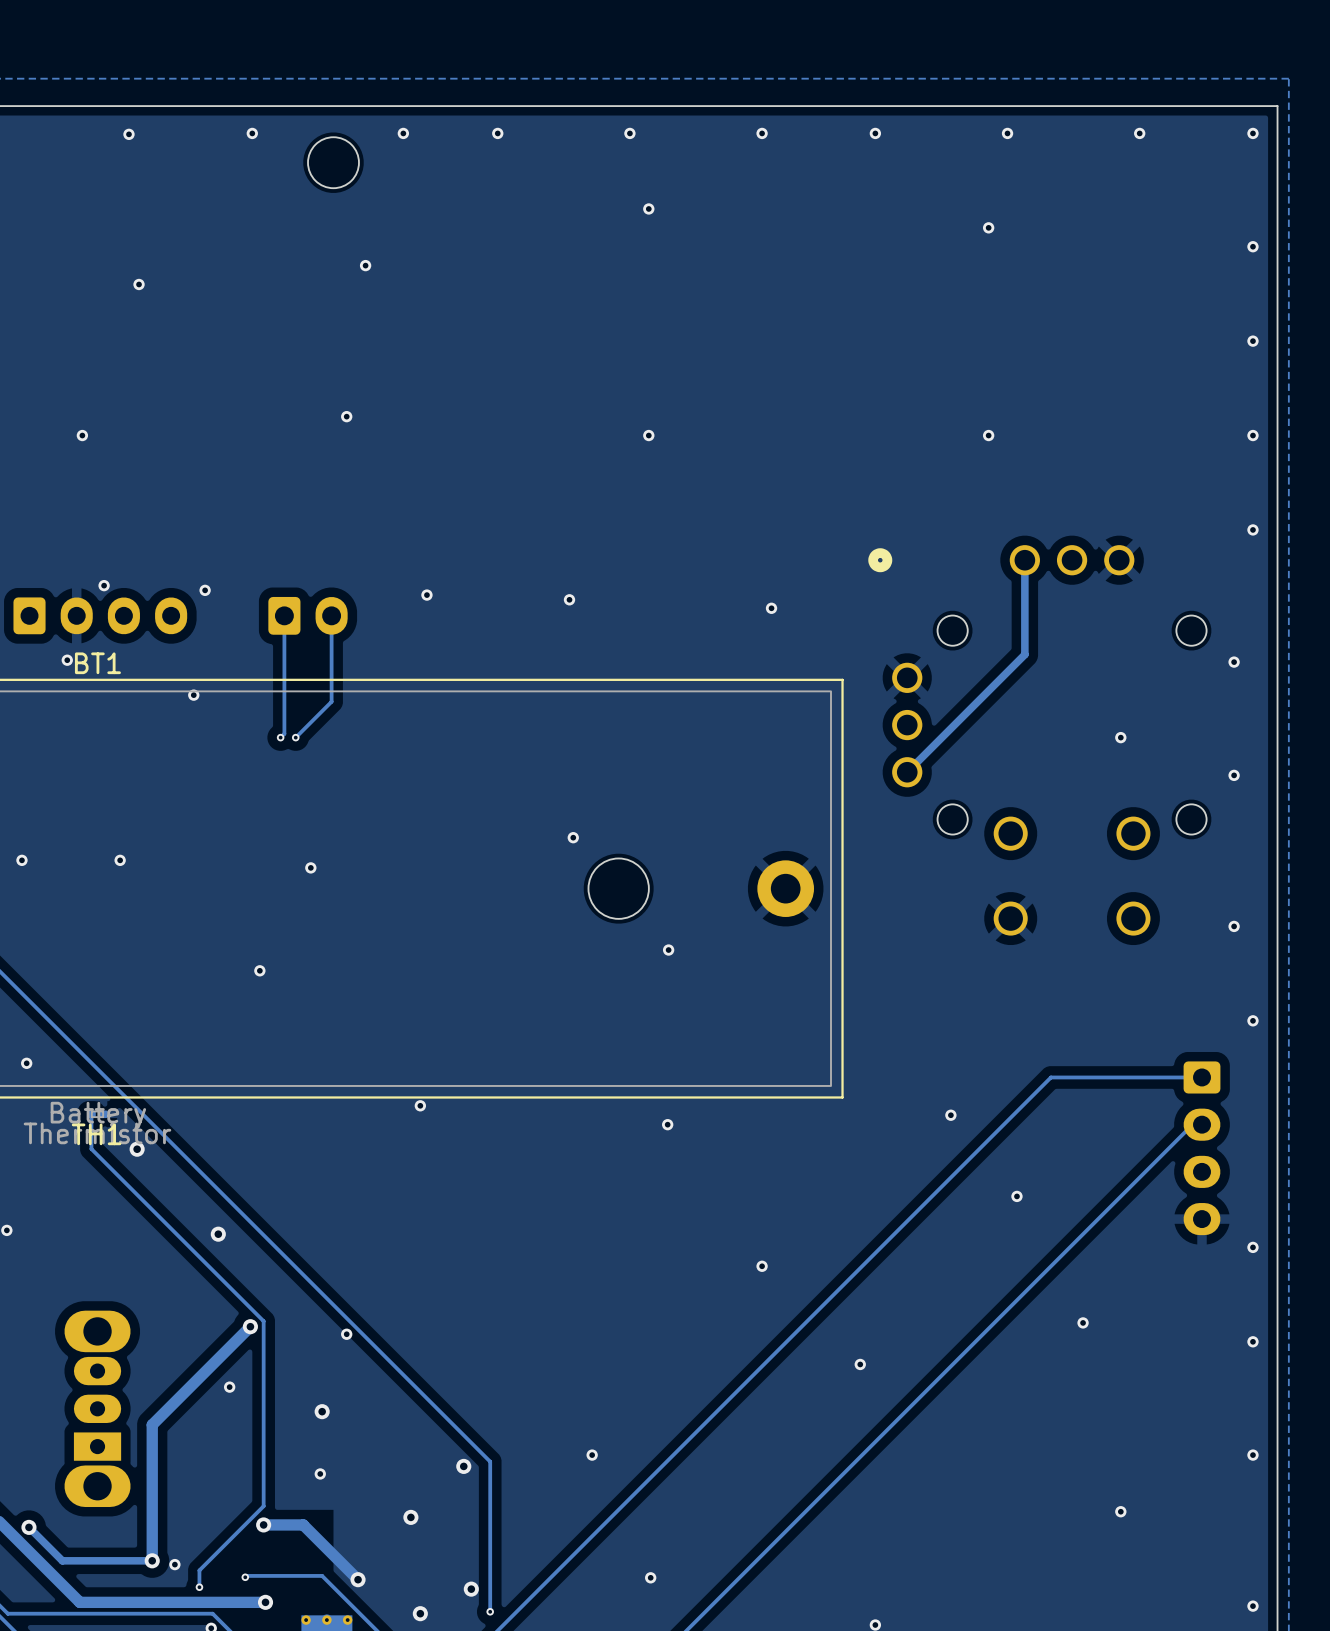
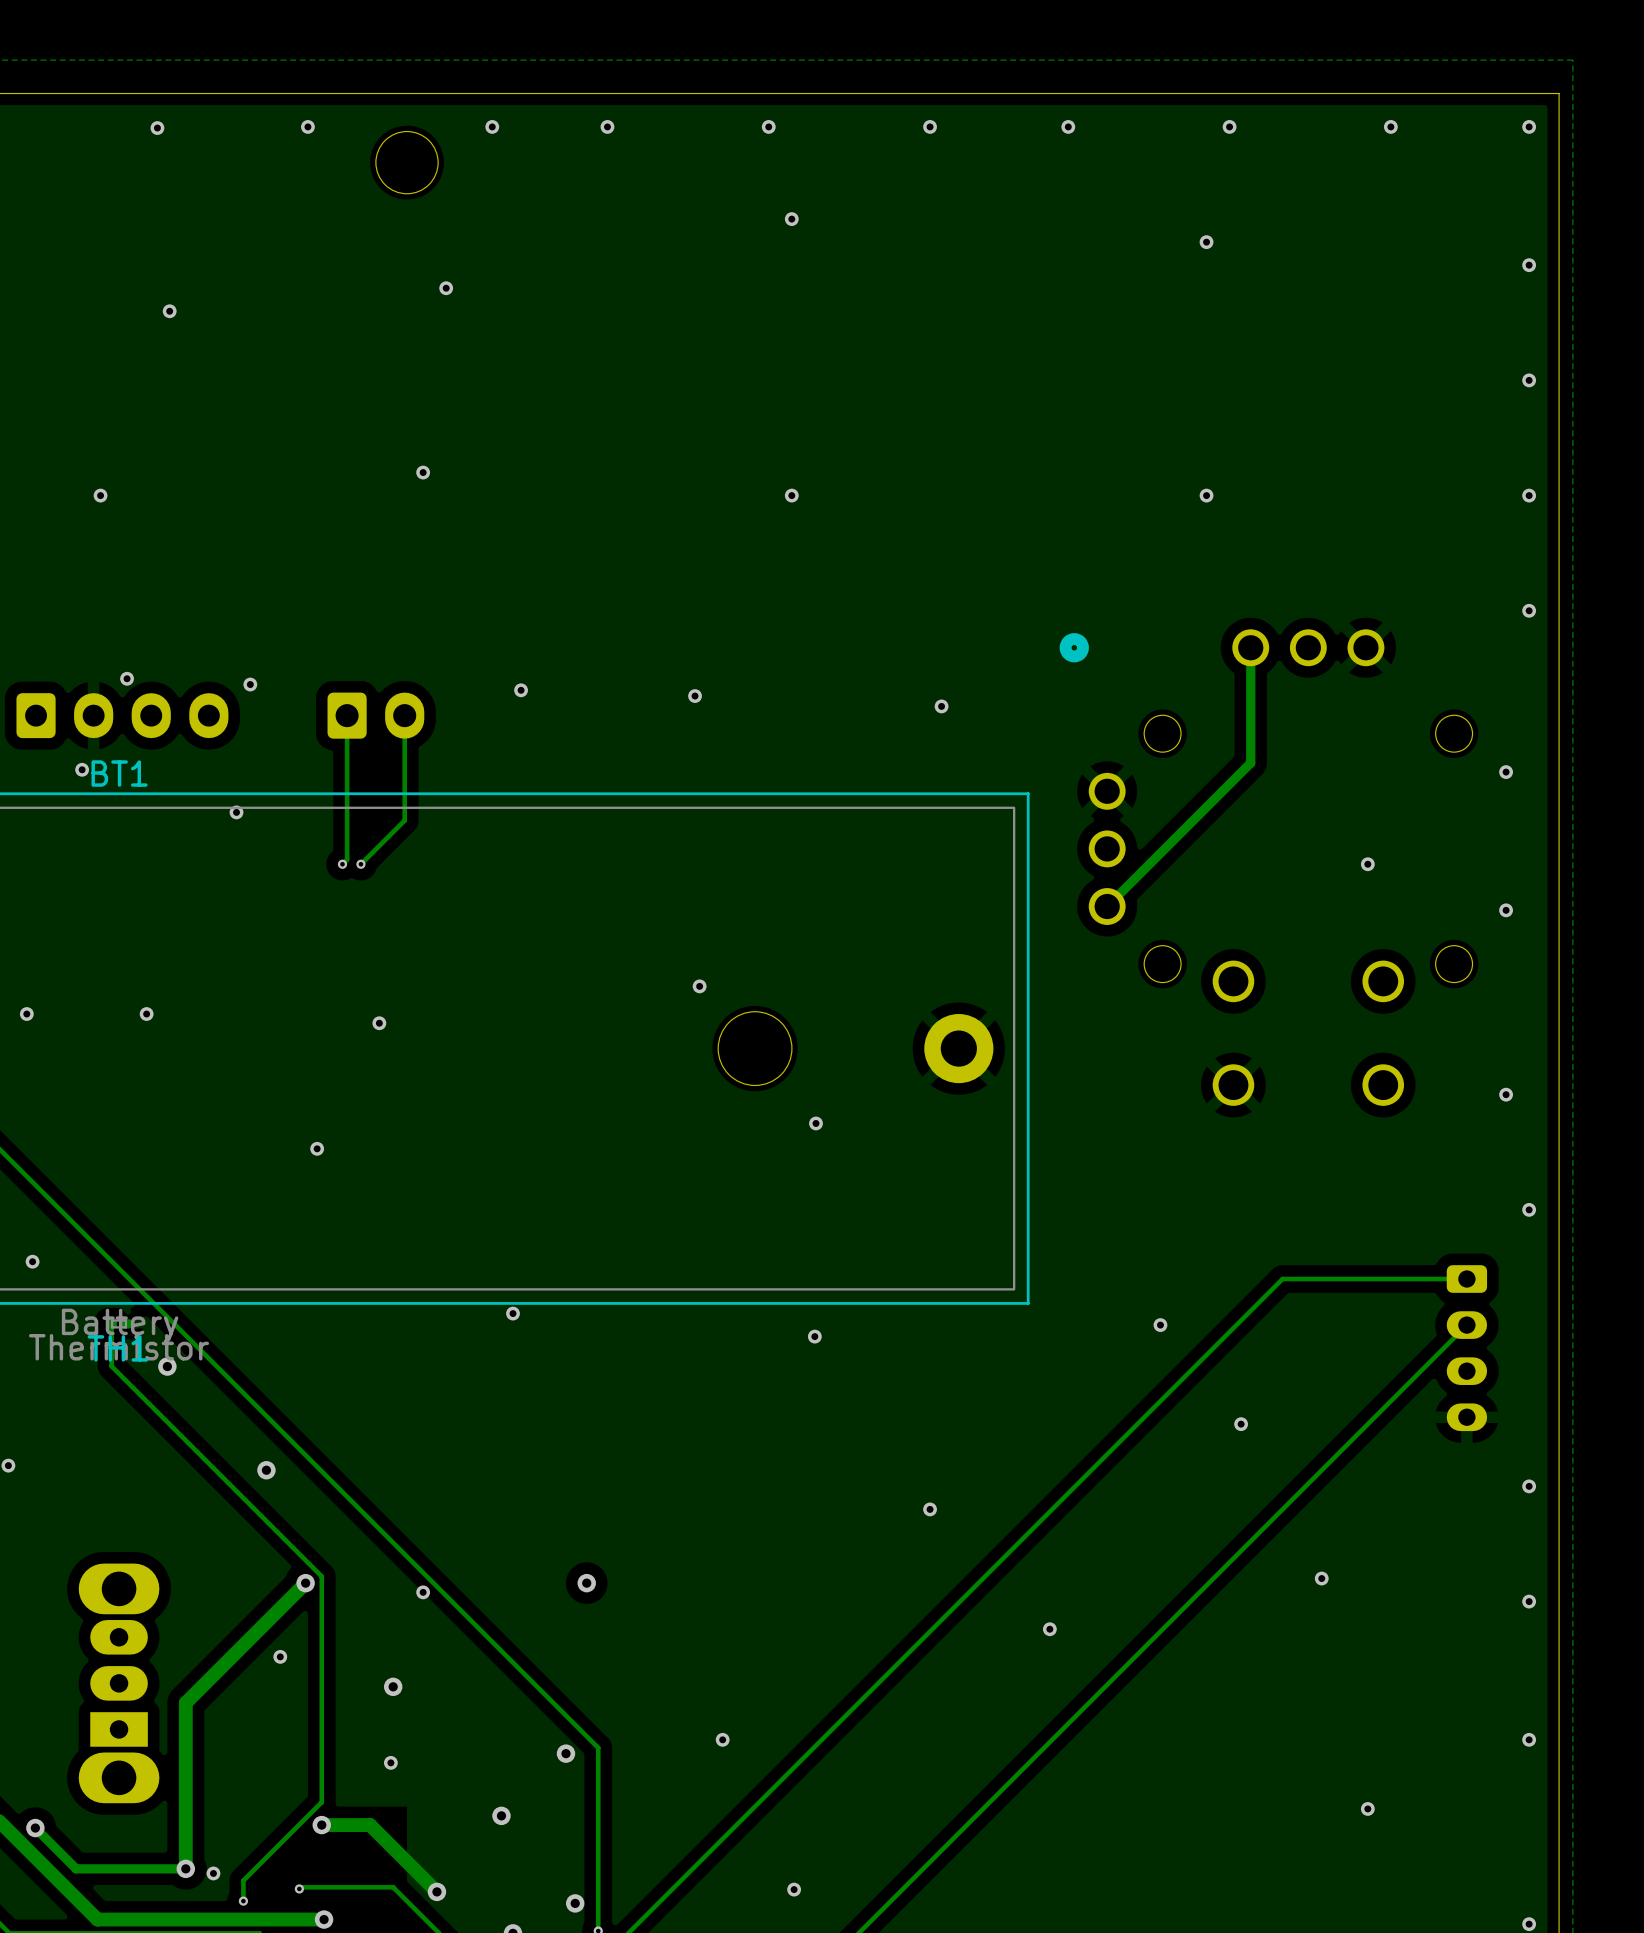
part footprint: [1183, 1061, 1221, 1236] -> [1446, 1265, 1488, 1432]
via: none -> (586, 1583)

